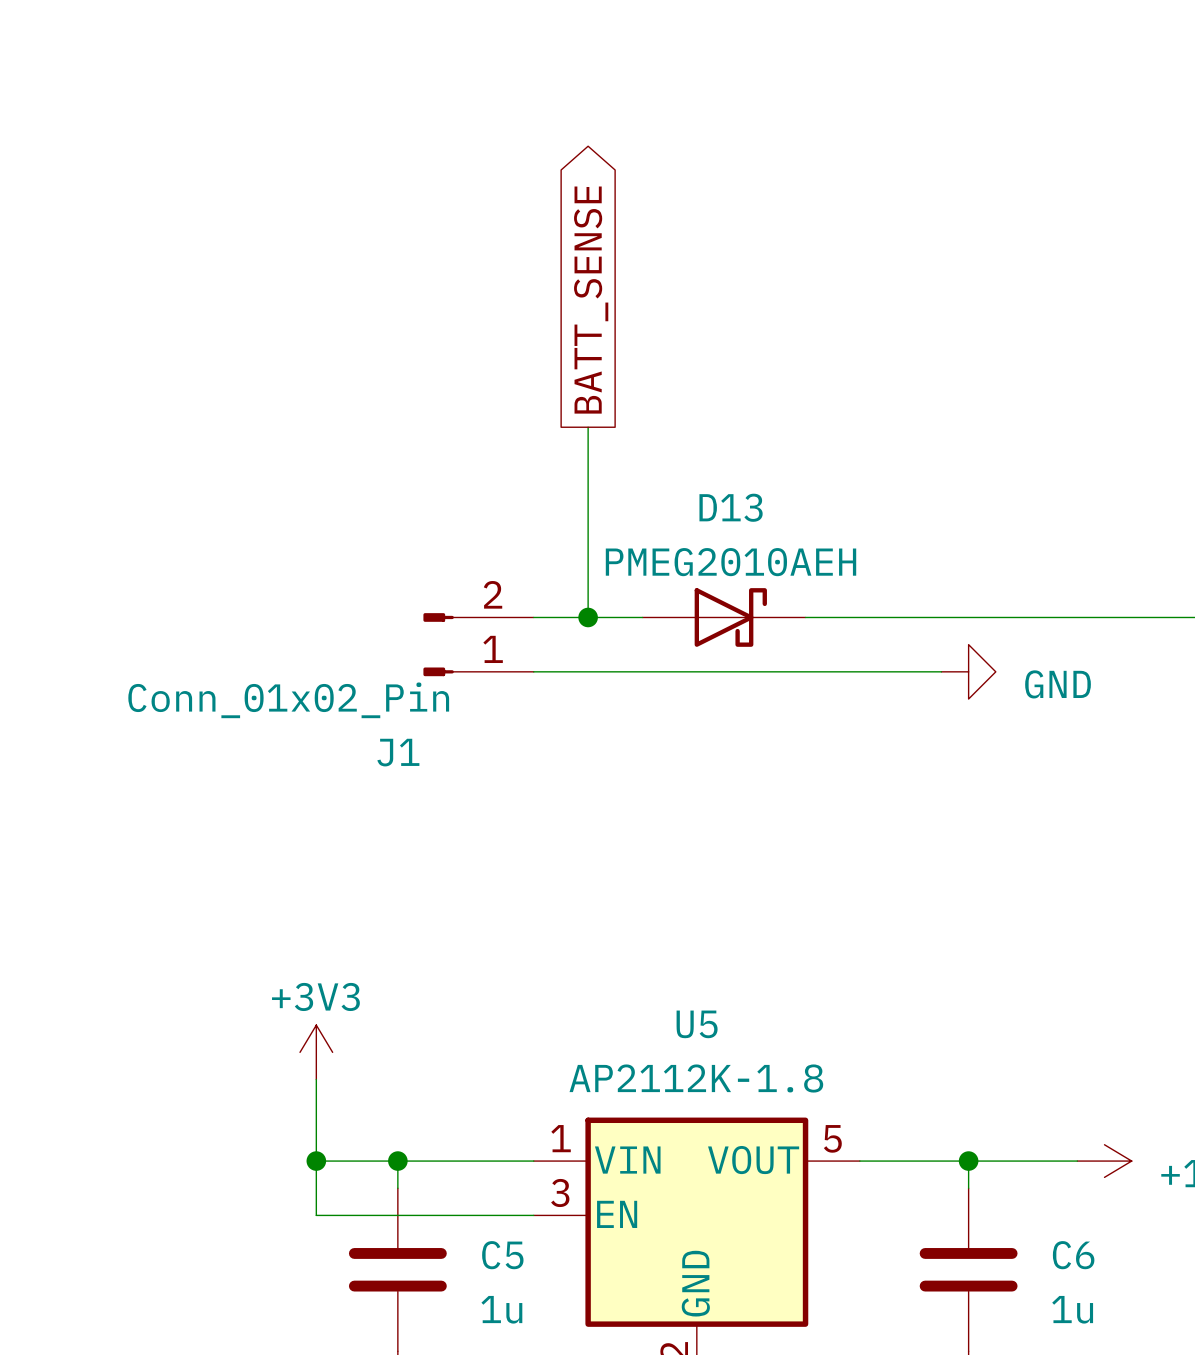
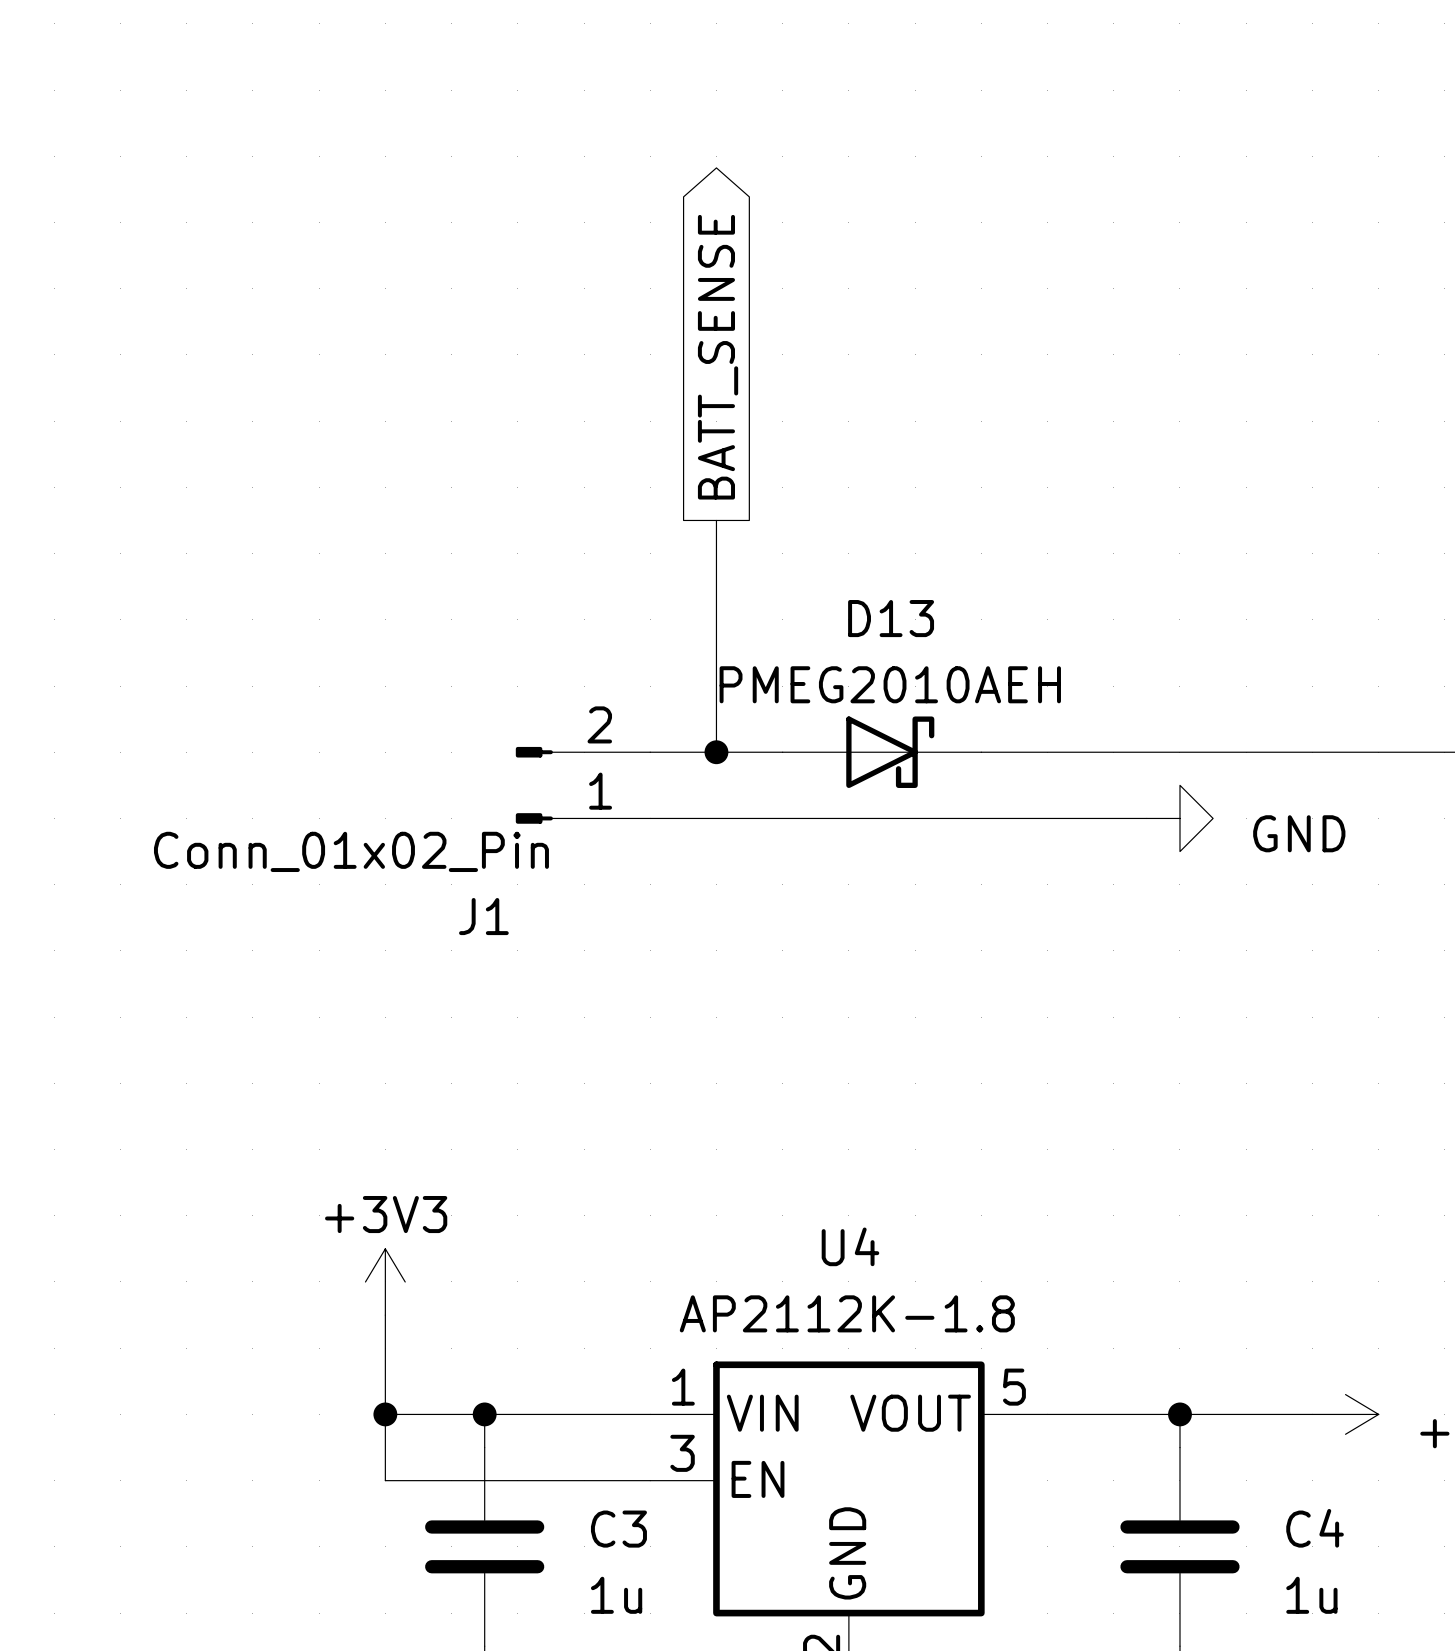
U5 name: U5 (697, 1024) -> U4 (850, 1246)
C5 name: C5 (502, 1255) -> C3 (618, 1529)
C6 name: C6 (1073, 1255) -> C4 (1315, 1528)

